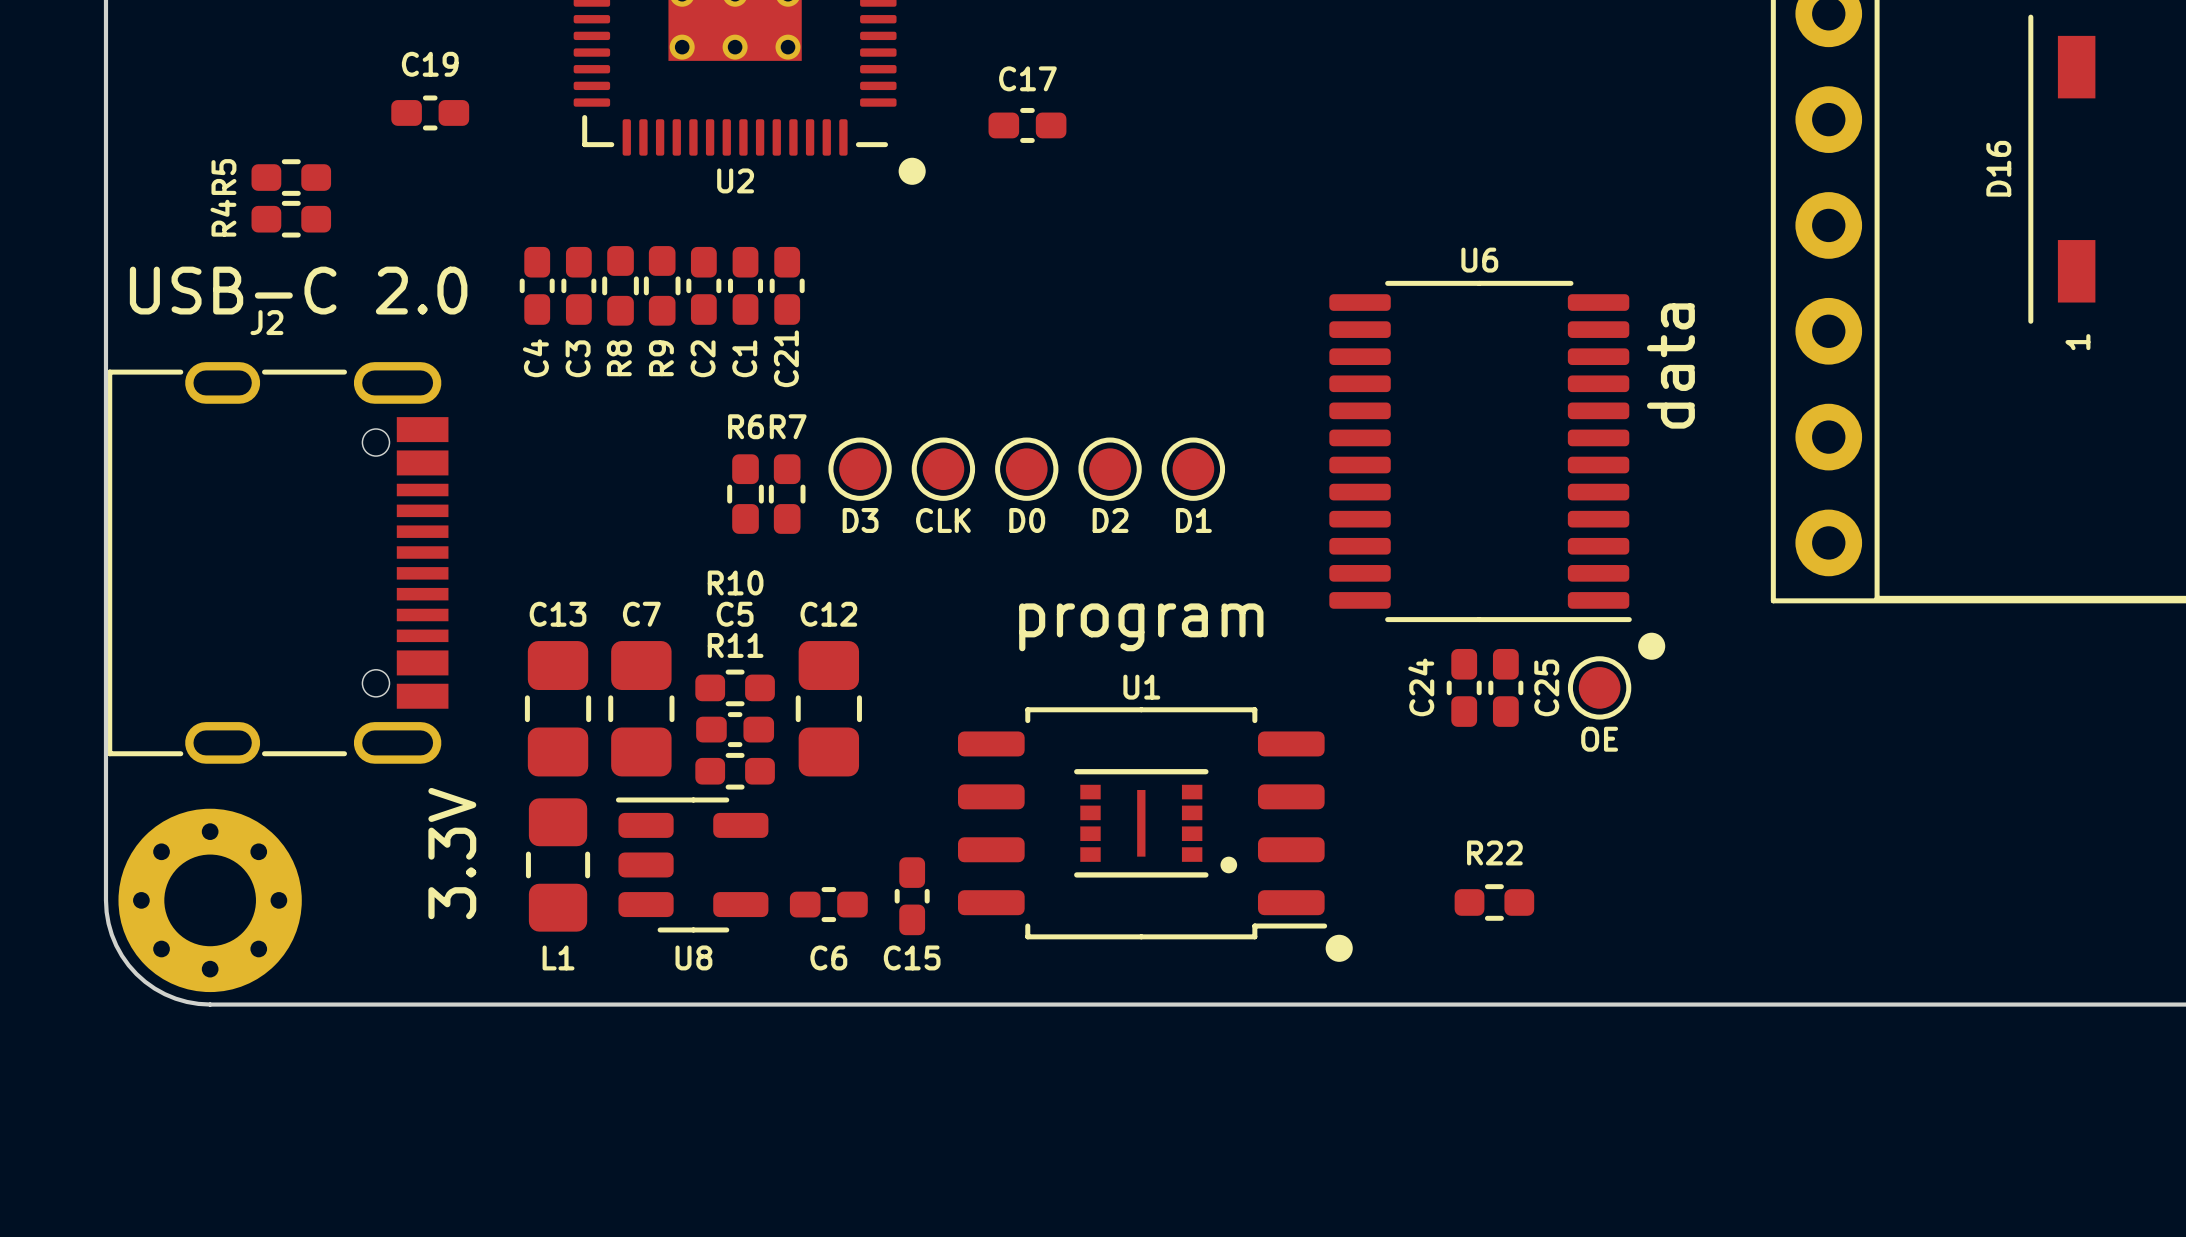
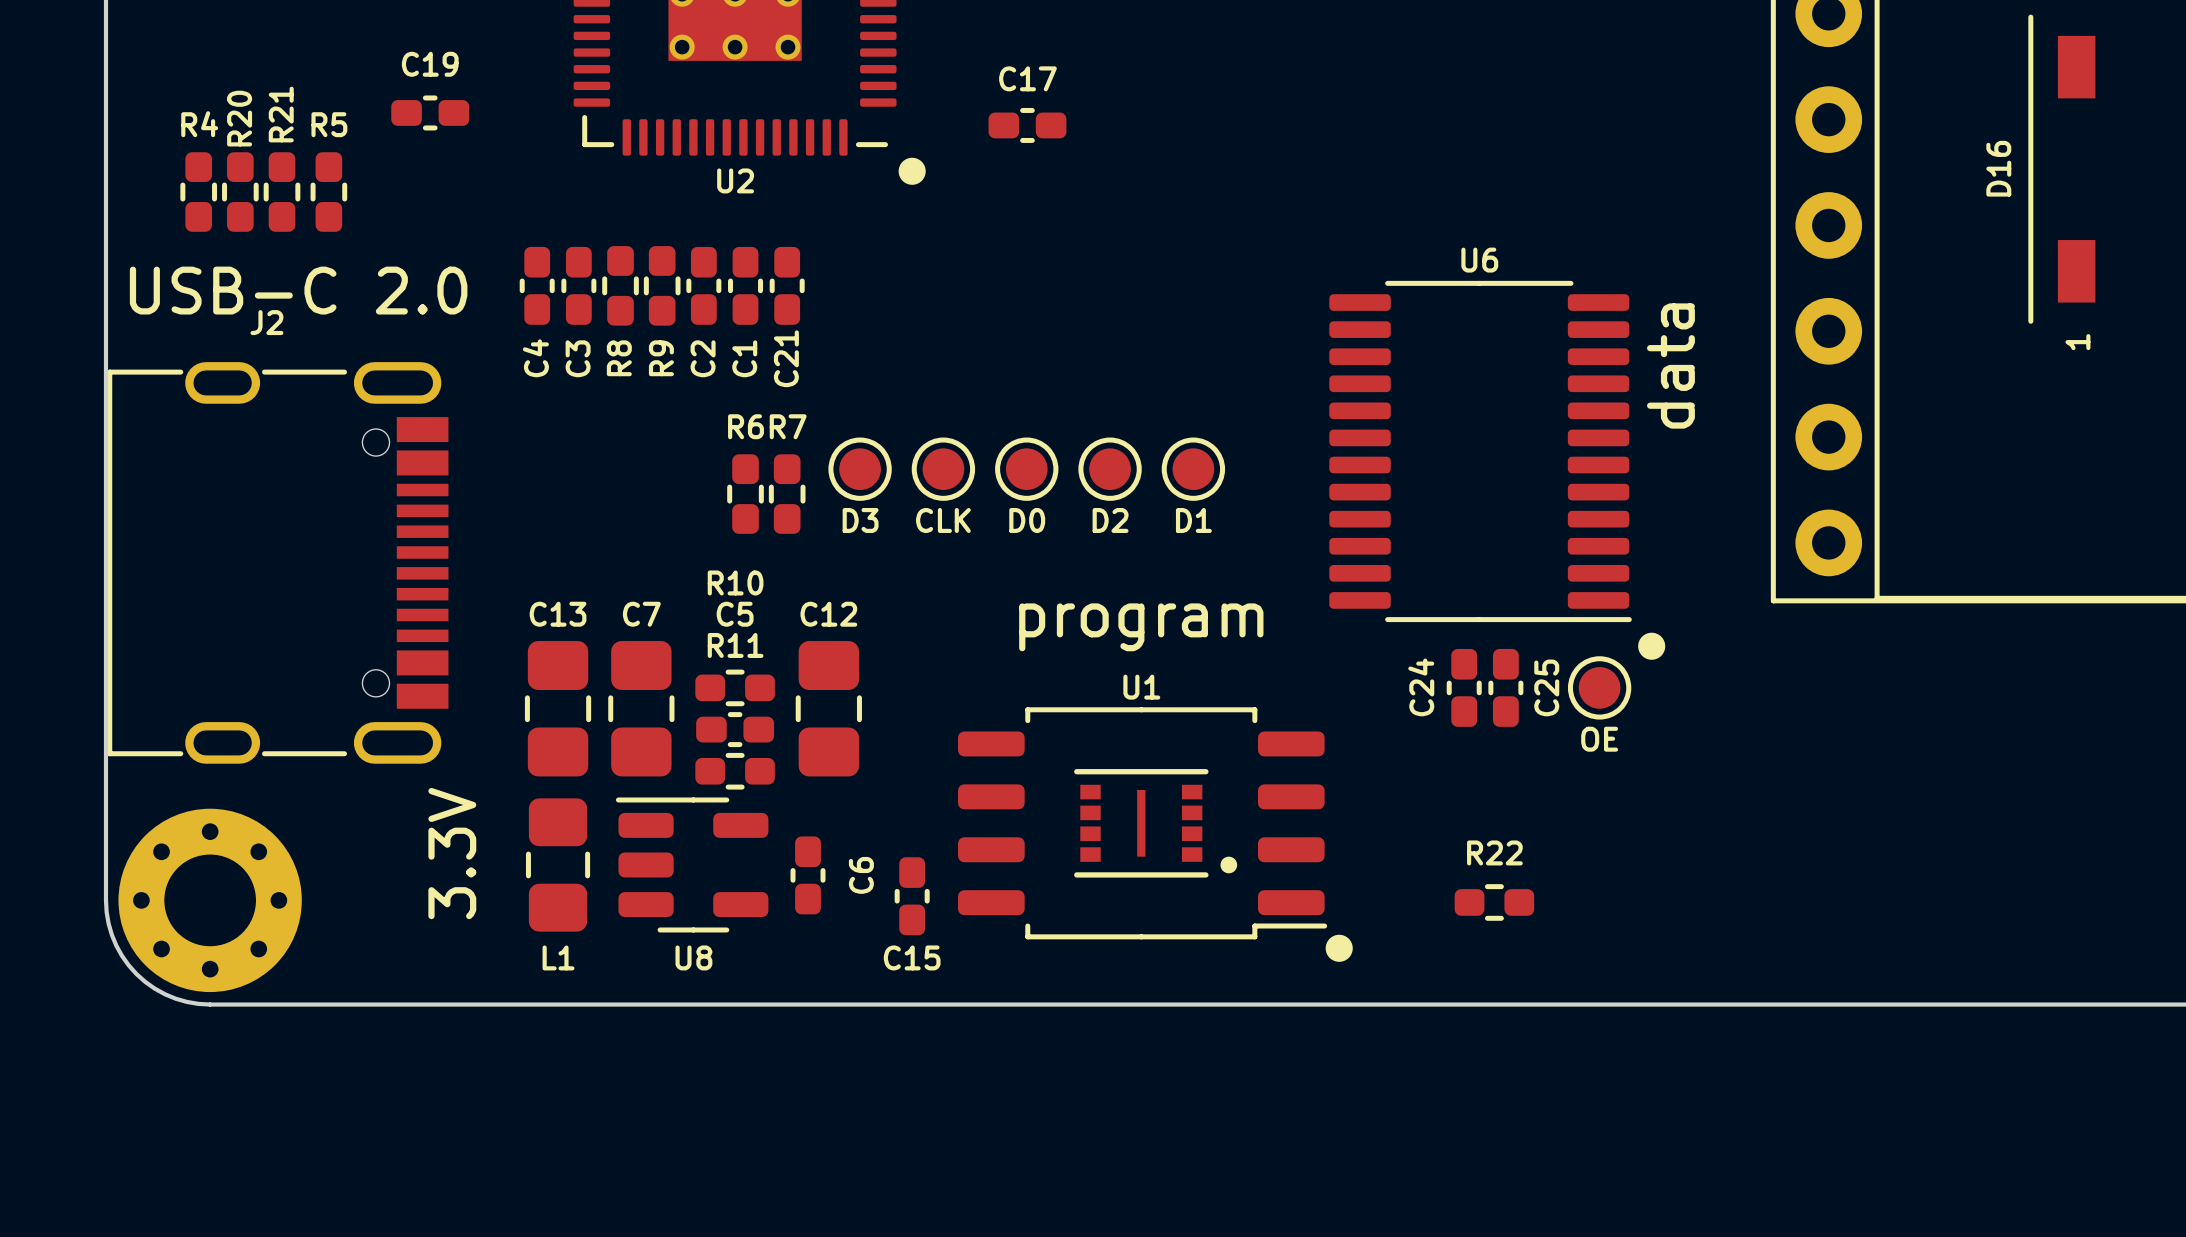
R5 rotation: 0° (291, 177) -> 90° clockwise (328, 192)
R20: none -> (240, 192)
R21: none -> (282, 192)
R4 rotation: 0° (291, 219) -> 90° clockwise (198, 192)
R4 position: (291, 219) -> (198, 192)
C6 rotation: 0° (828, 904) -> 90° clockwise (808, 875)

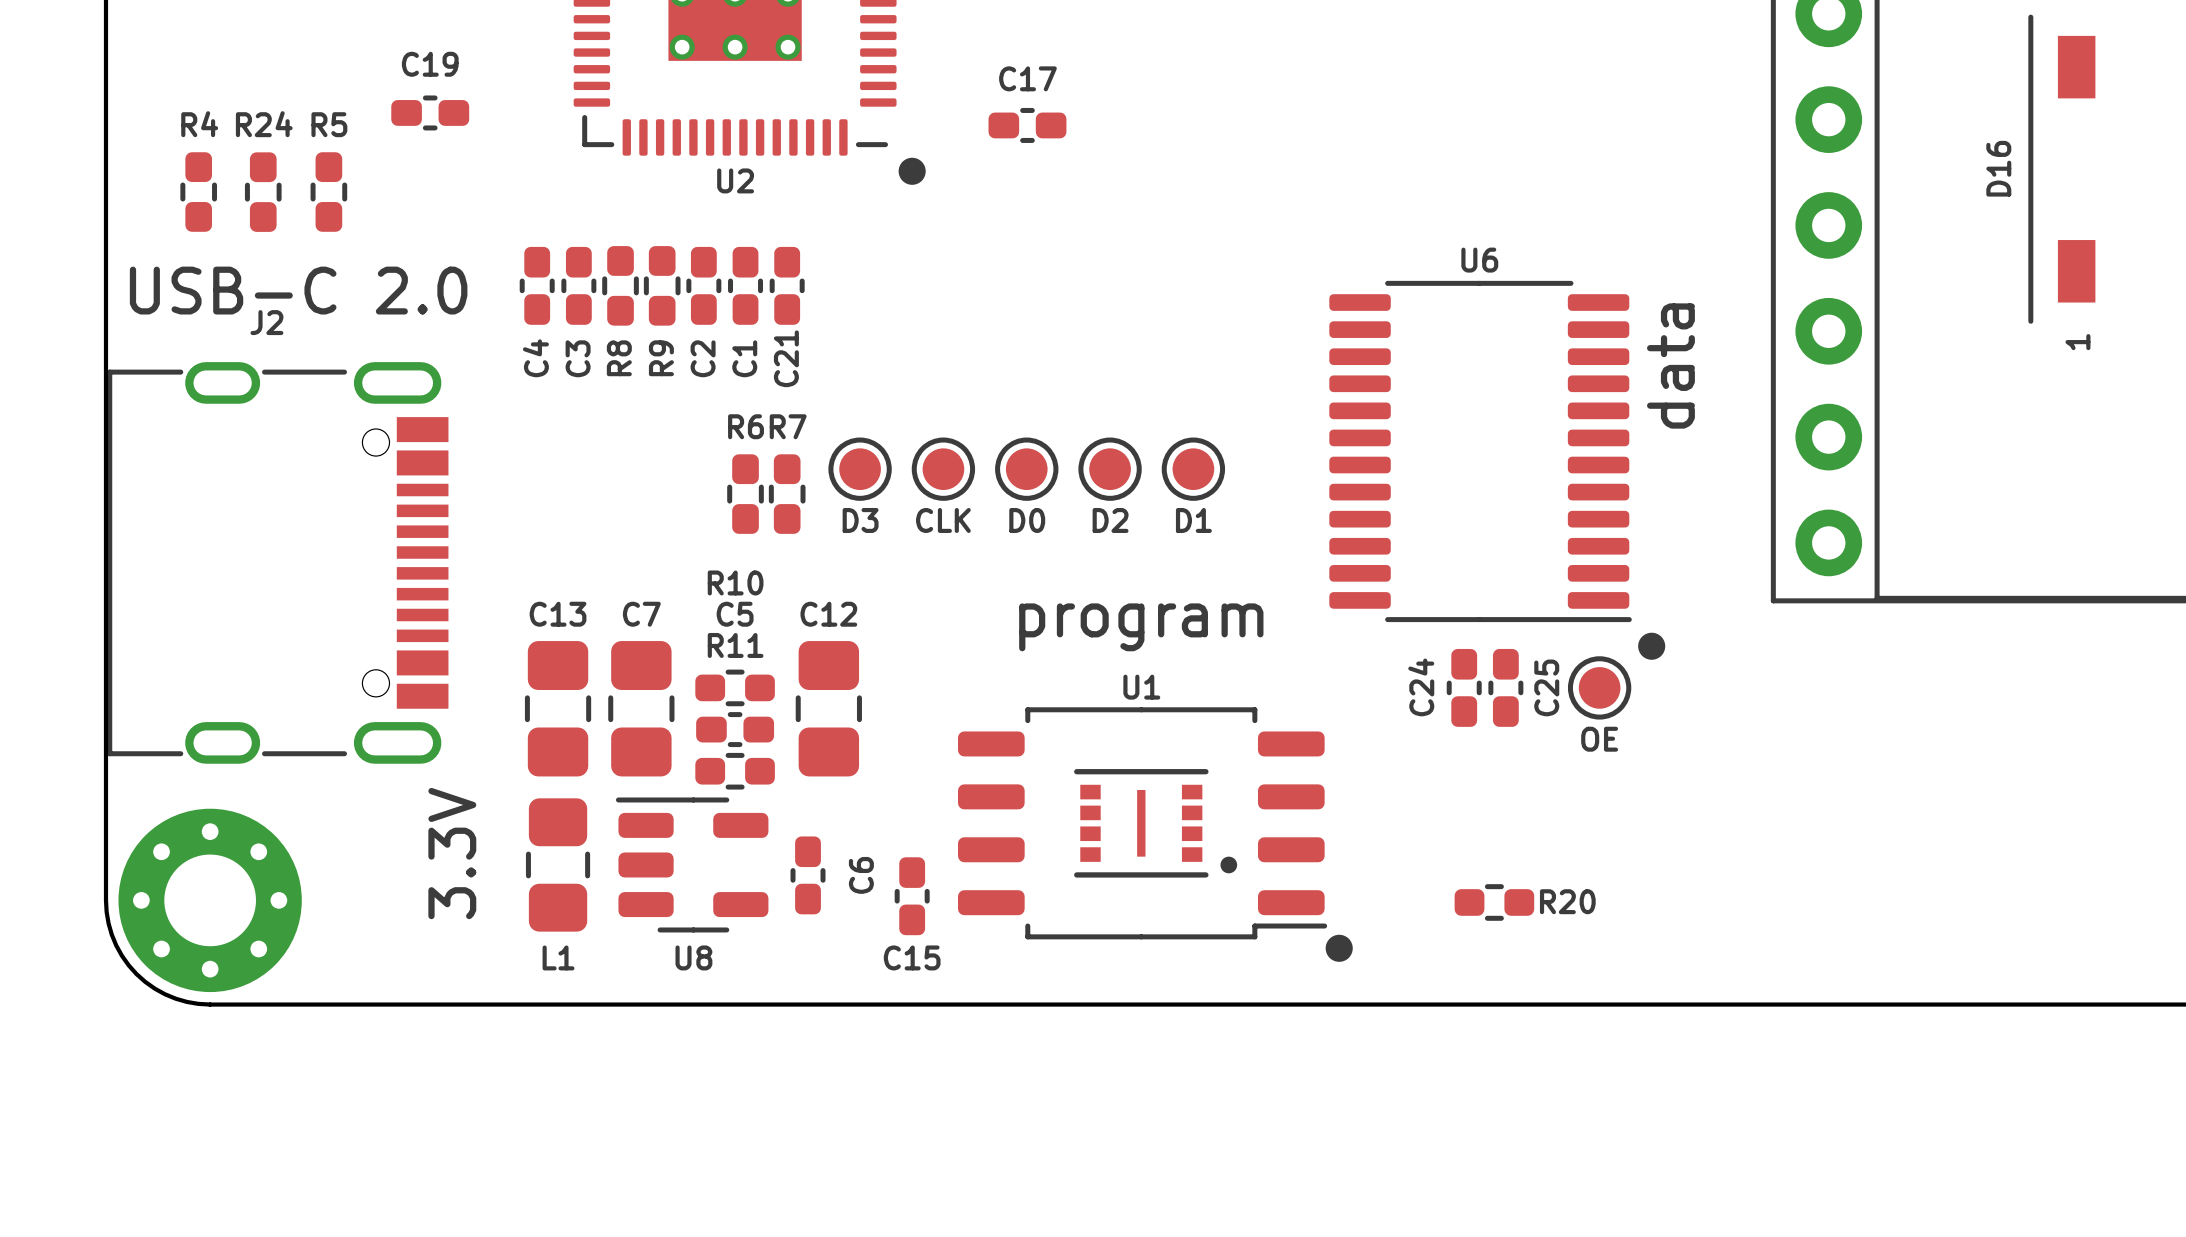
R20: (240, 192) -> none
R24: none -> (263, 192)
R21: (282, 192) -> none
R22 name: R22 (1494, 852) -> R20 (1567, 901)

